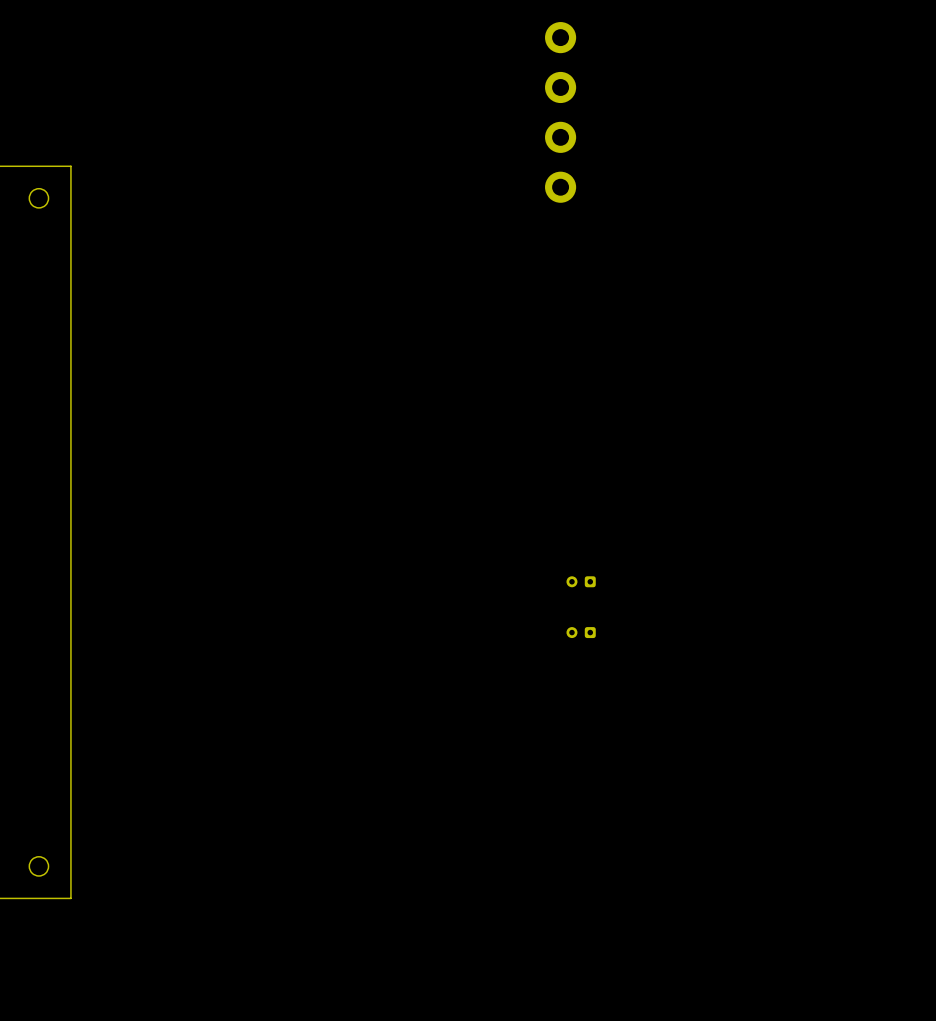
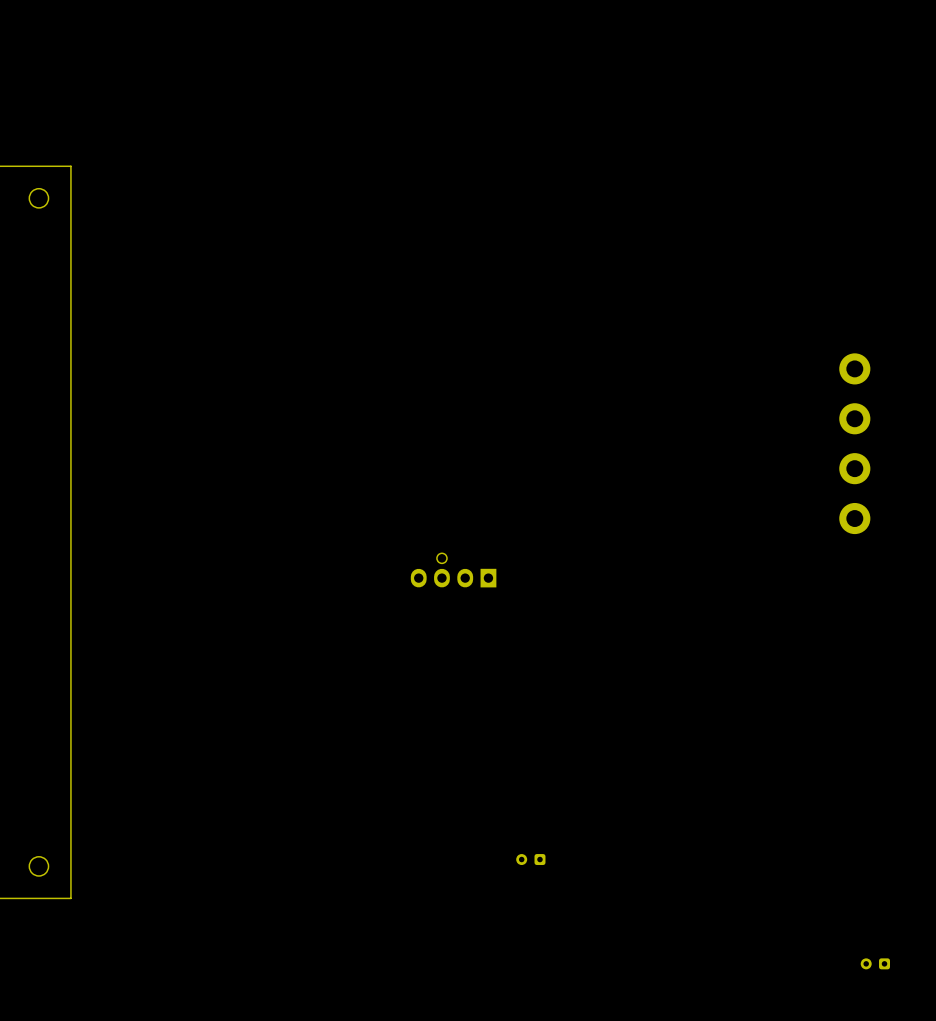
part: (560, 37) -> none
part: (560, 87) -> none
part: (560, 137) -> none
part: (560, 187) -> none
part: none -> (854, 368)
part: none -> (854, 418)
part: none -> (854, 468)
part: none -> (854, 518)
part: none -> (453, 570)
part: (581, 581) -> none
part: (581, 632) -> none
part: none -> (530, 859)
part: none -> (875, 963)

